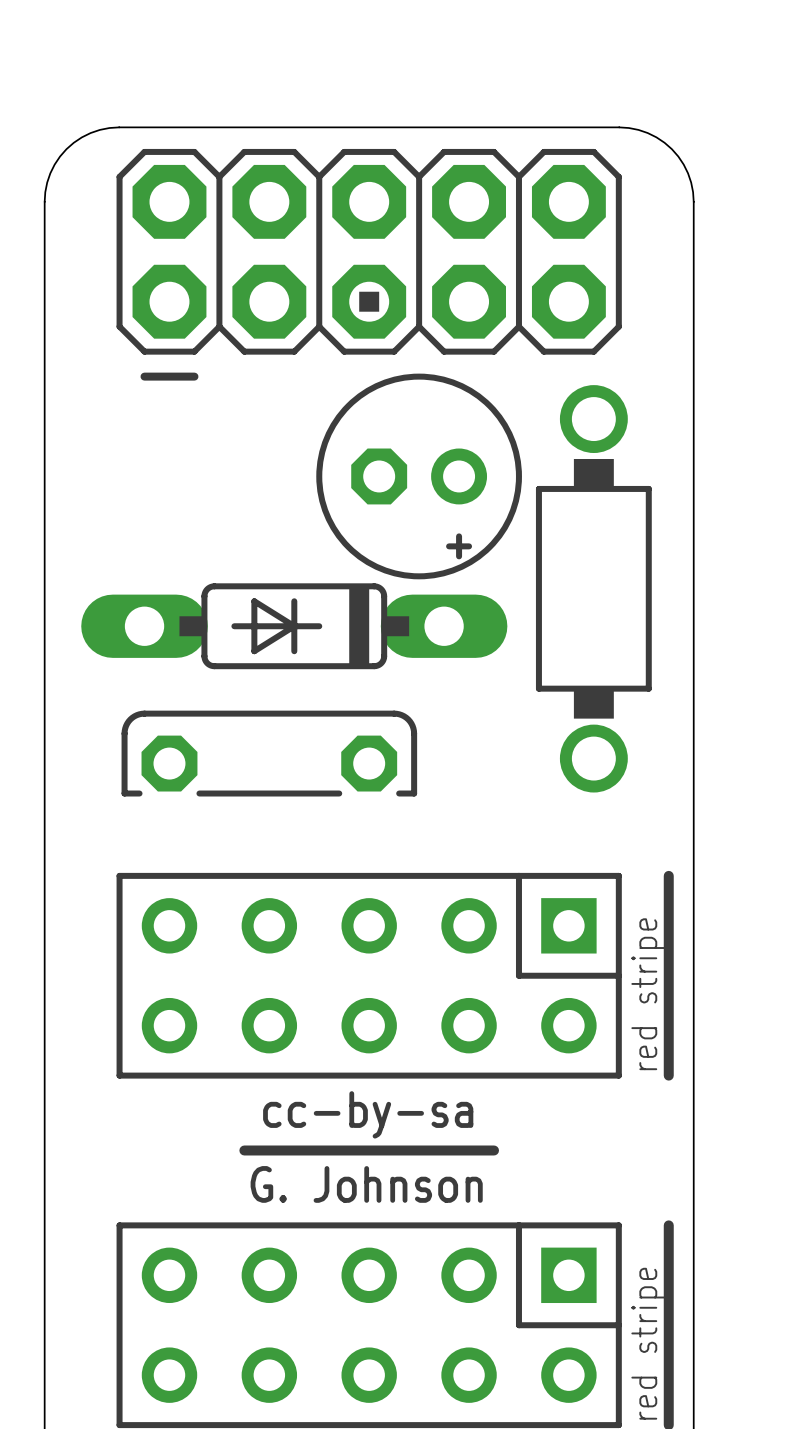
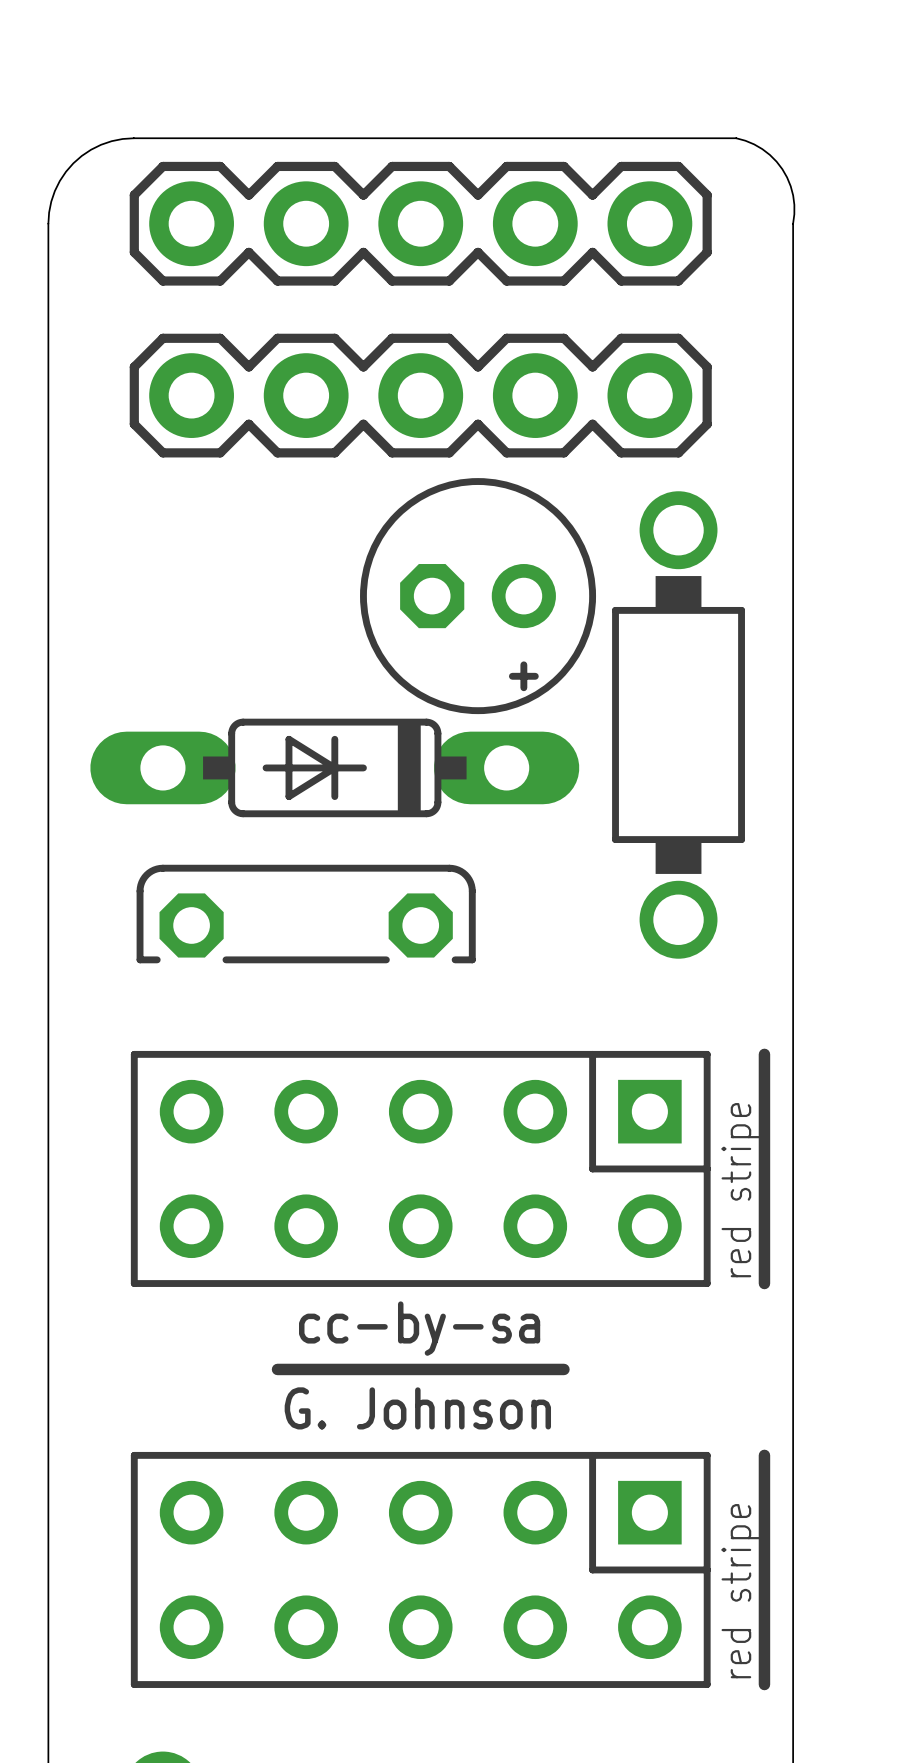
part footprint: [116, 148, 622, 381] -> [129, 333, 712, 458]
part: none -> (420, 223)
board edge: (44, 201) (50, 173) (66, 149) (90, 133) (119, 127) (628, 128) (647, 133) (671, 149) (688, 173) (693, 201) -> (48, 281) (49, 212) (59, 180) (73, 163) (91, 149) (111, 141) (133, 138) (736, 138) (754, 144) (769, 154) (782, 169) (790, 186) (794, 204) (793, 281)

